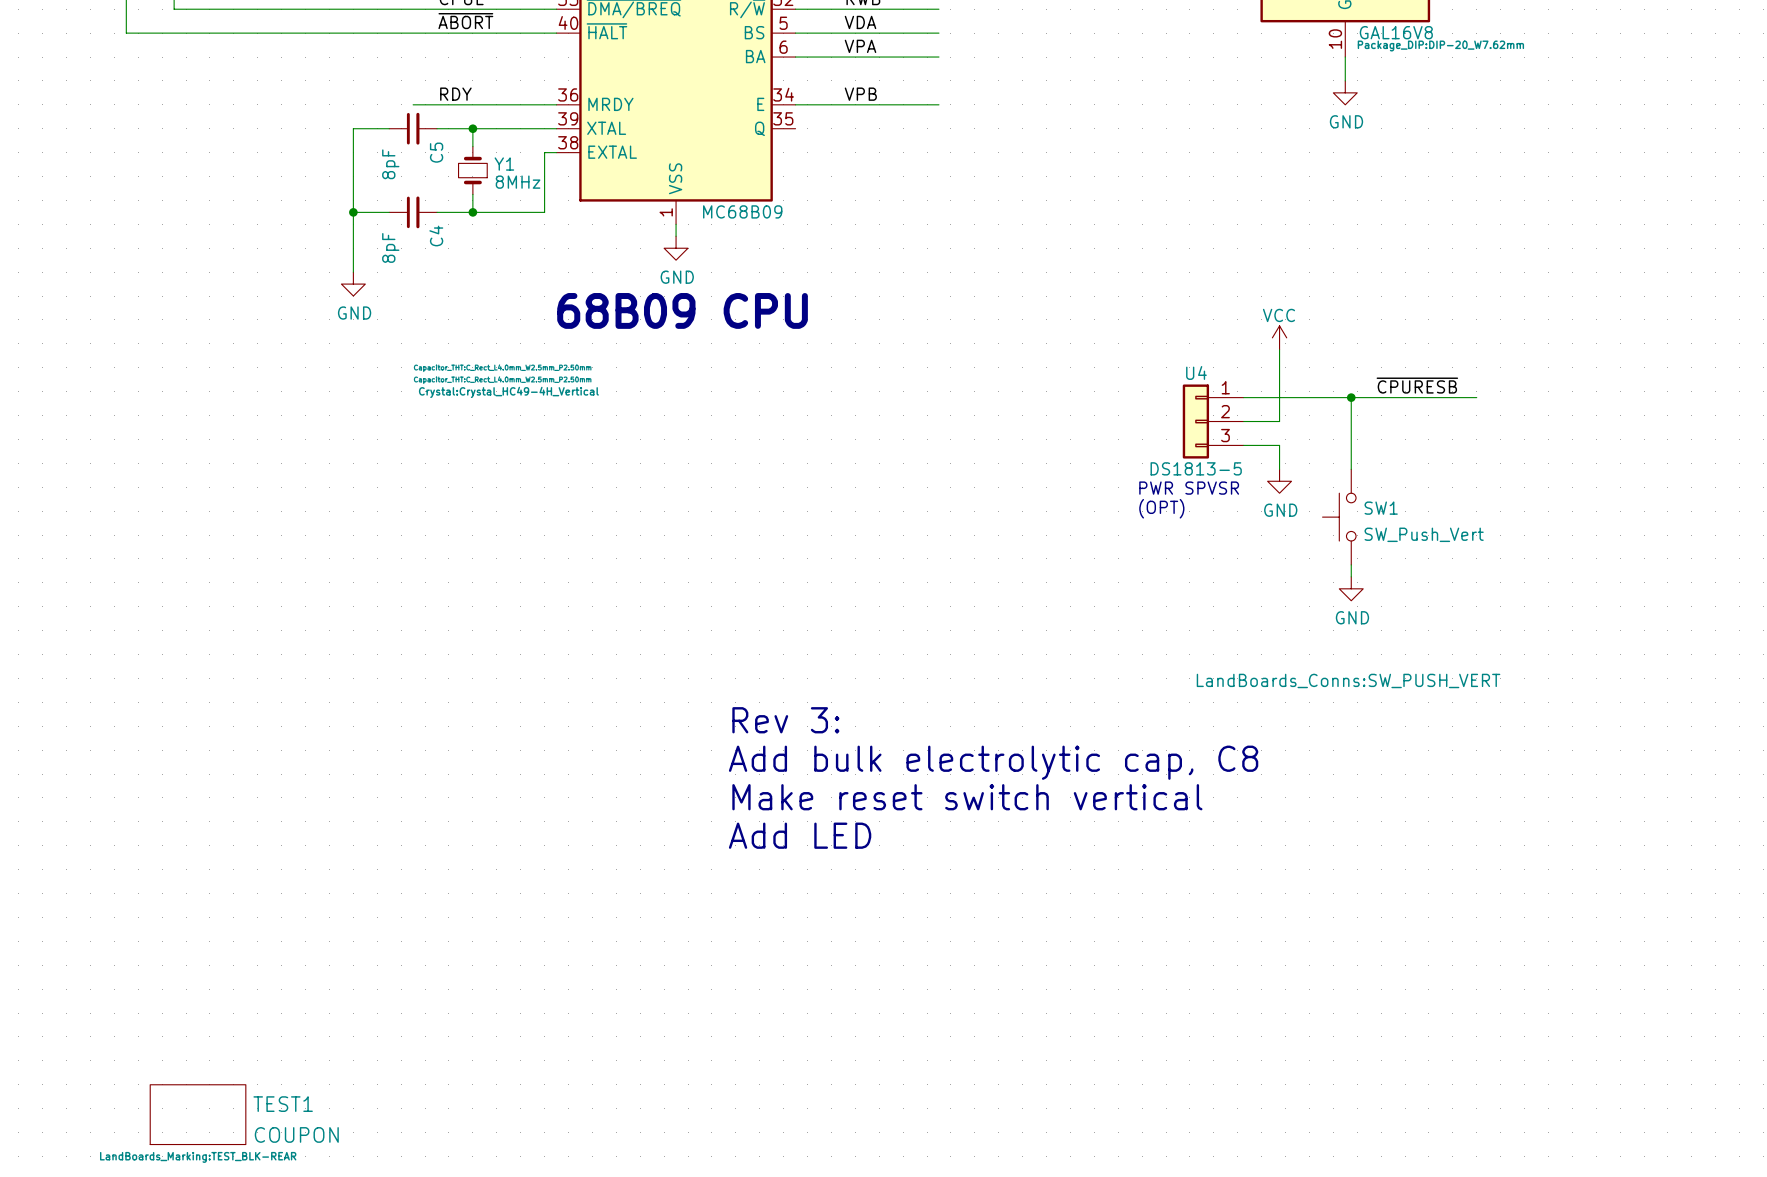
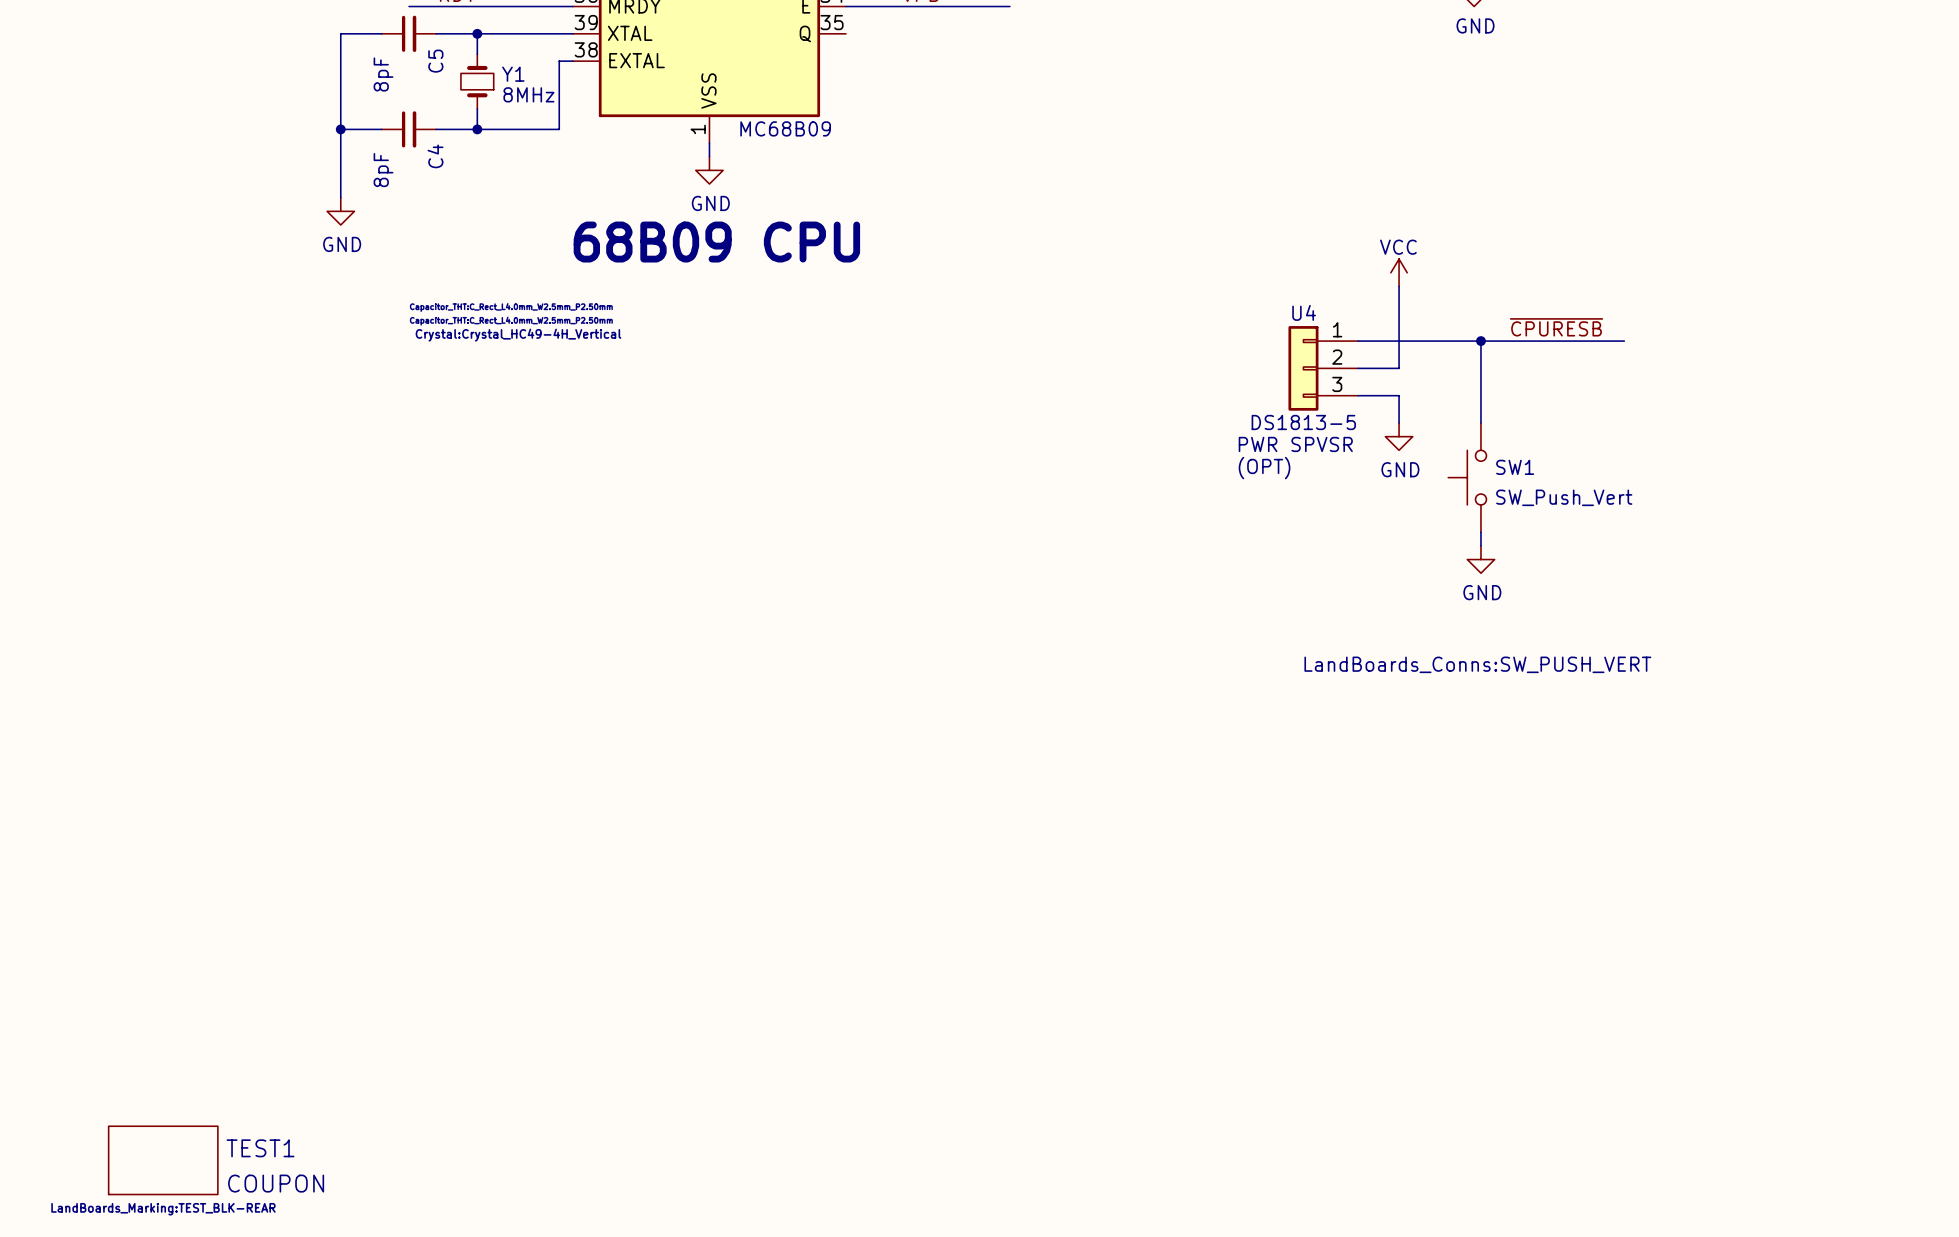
text: Rev 3: (785, 720) -> none
text: Add bulk electrolytic cap, C8 (993, 762) -> none
text: Make reset switch vertical (967, 797) -> none
text: Add LED (800, 835) -> none

